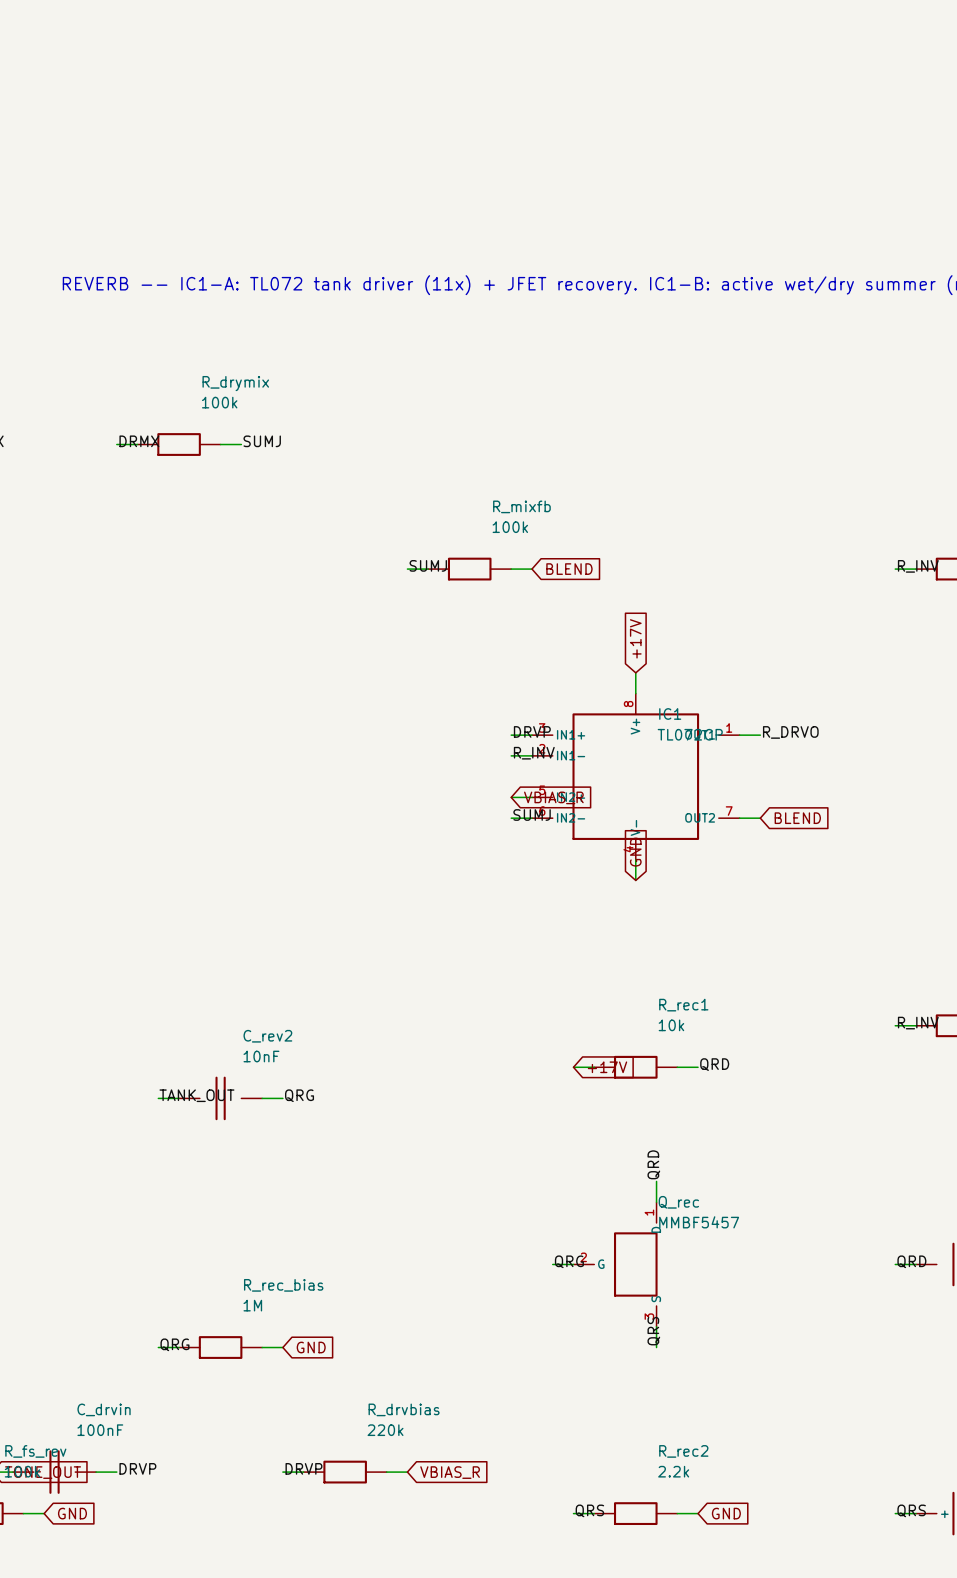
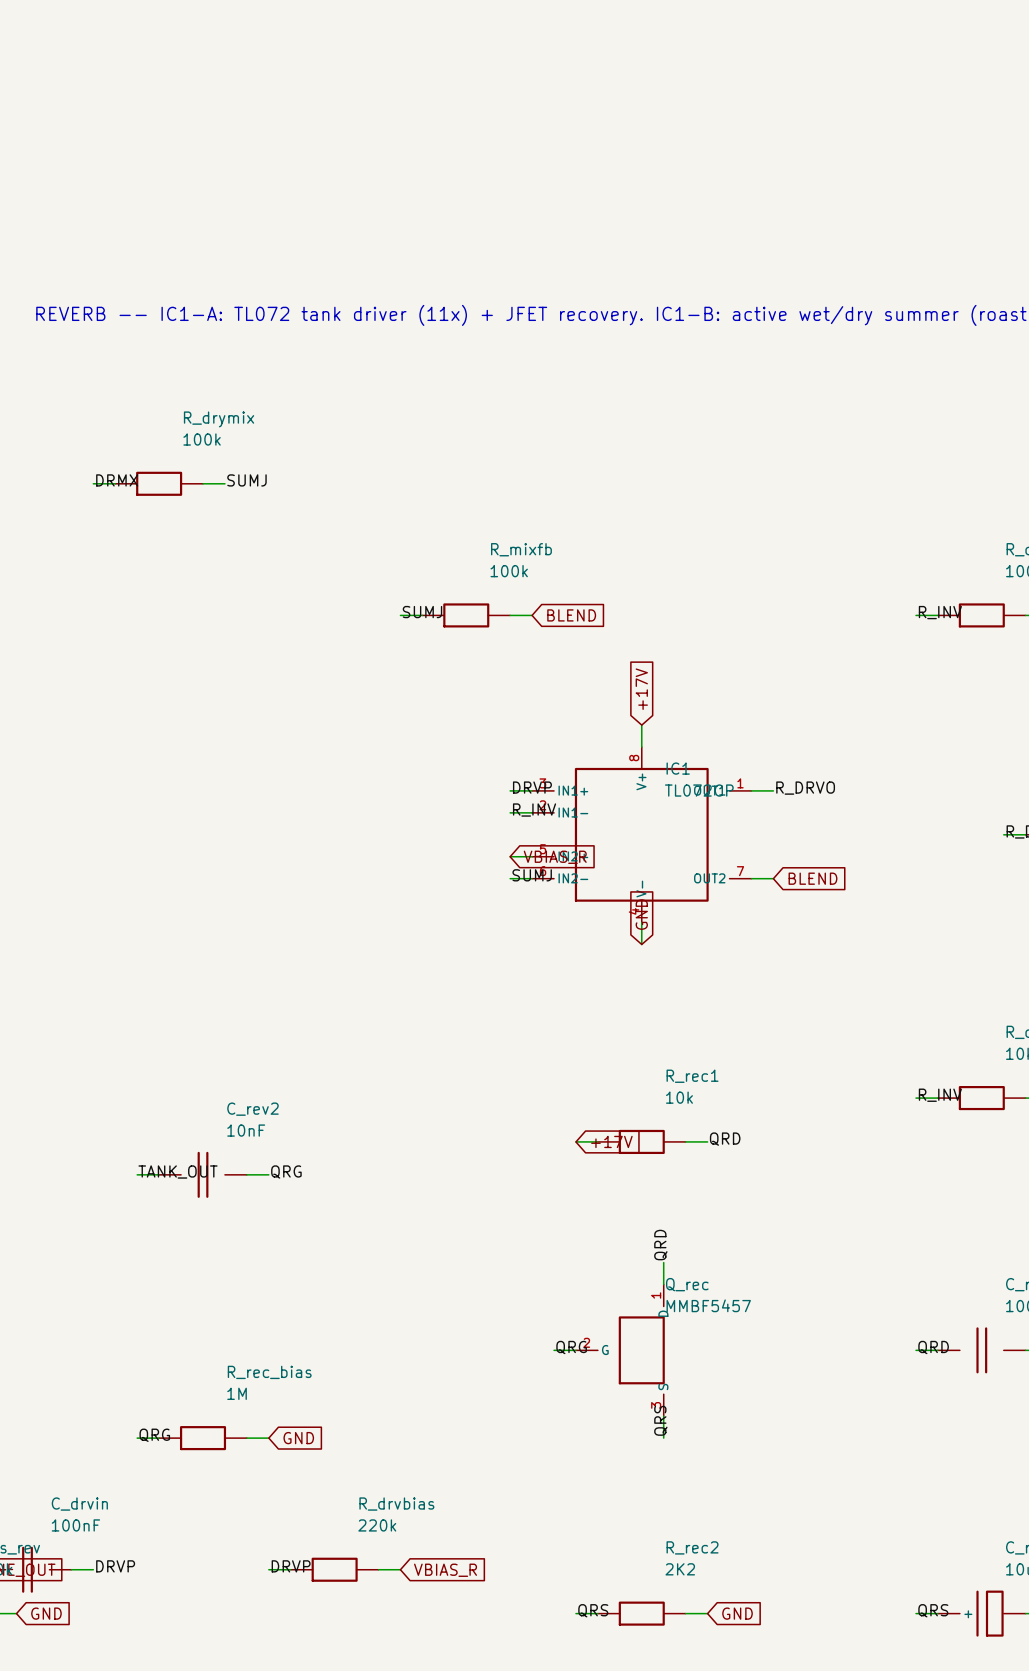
R_rec2 value: 2.2k (673, 1471) -> 2K2 (680, 1569)

